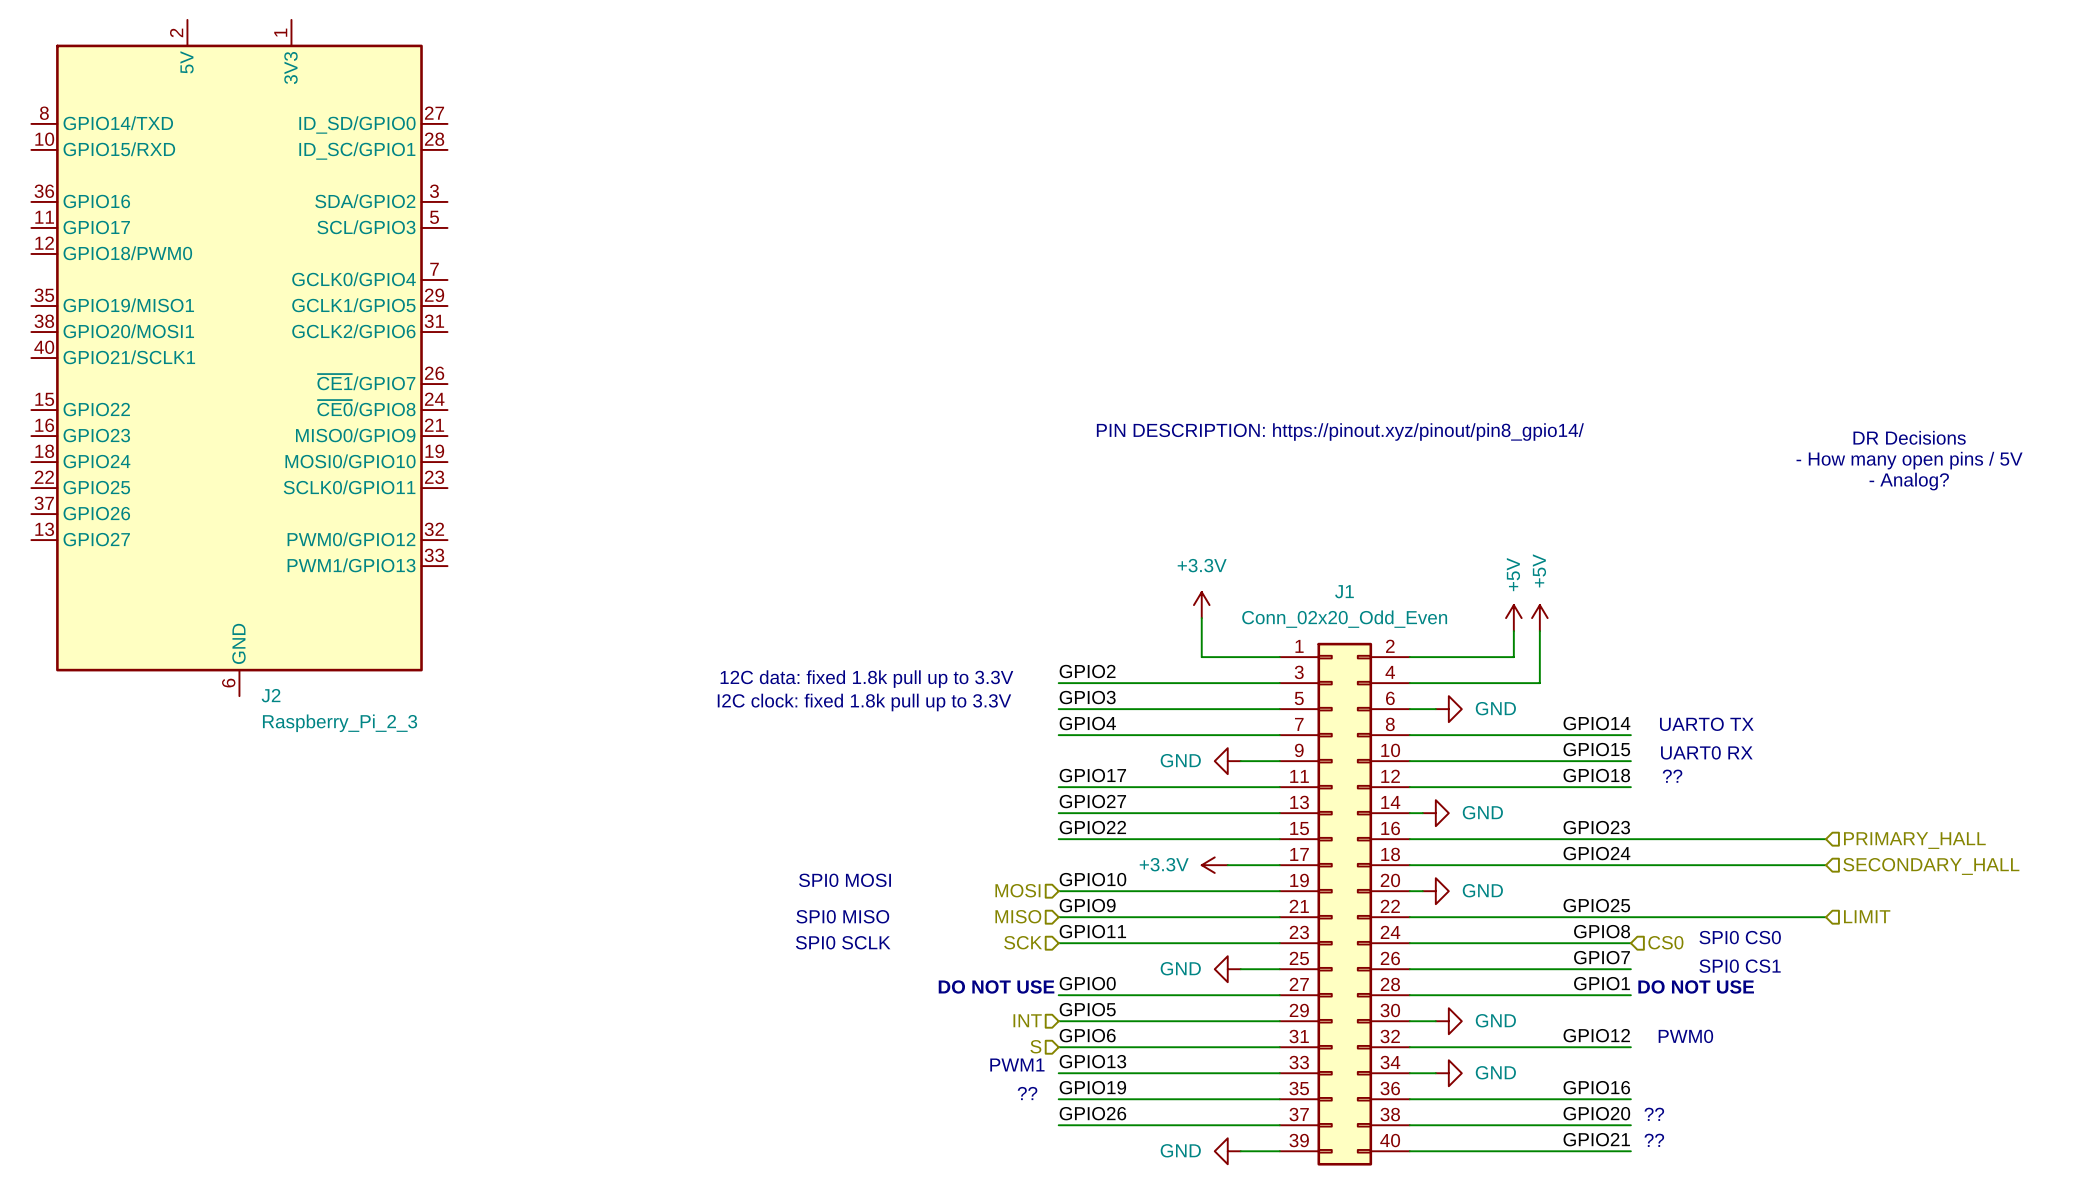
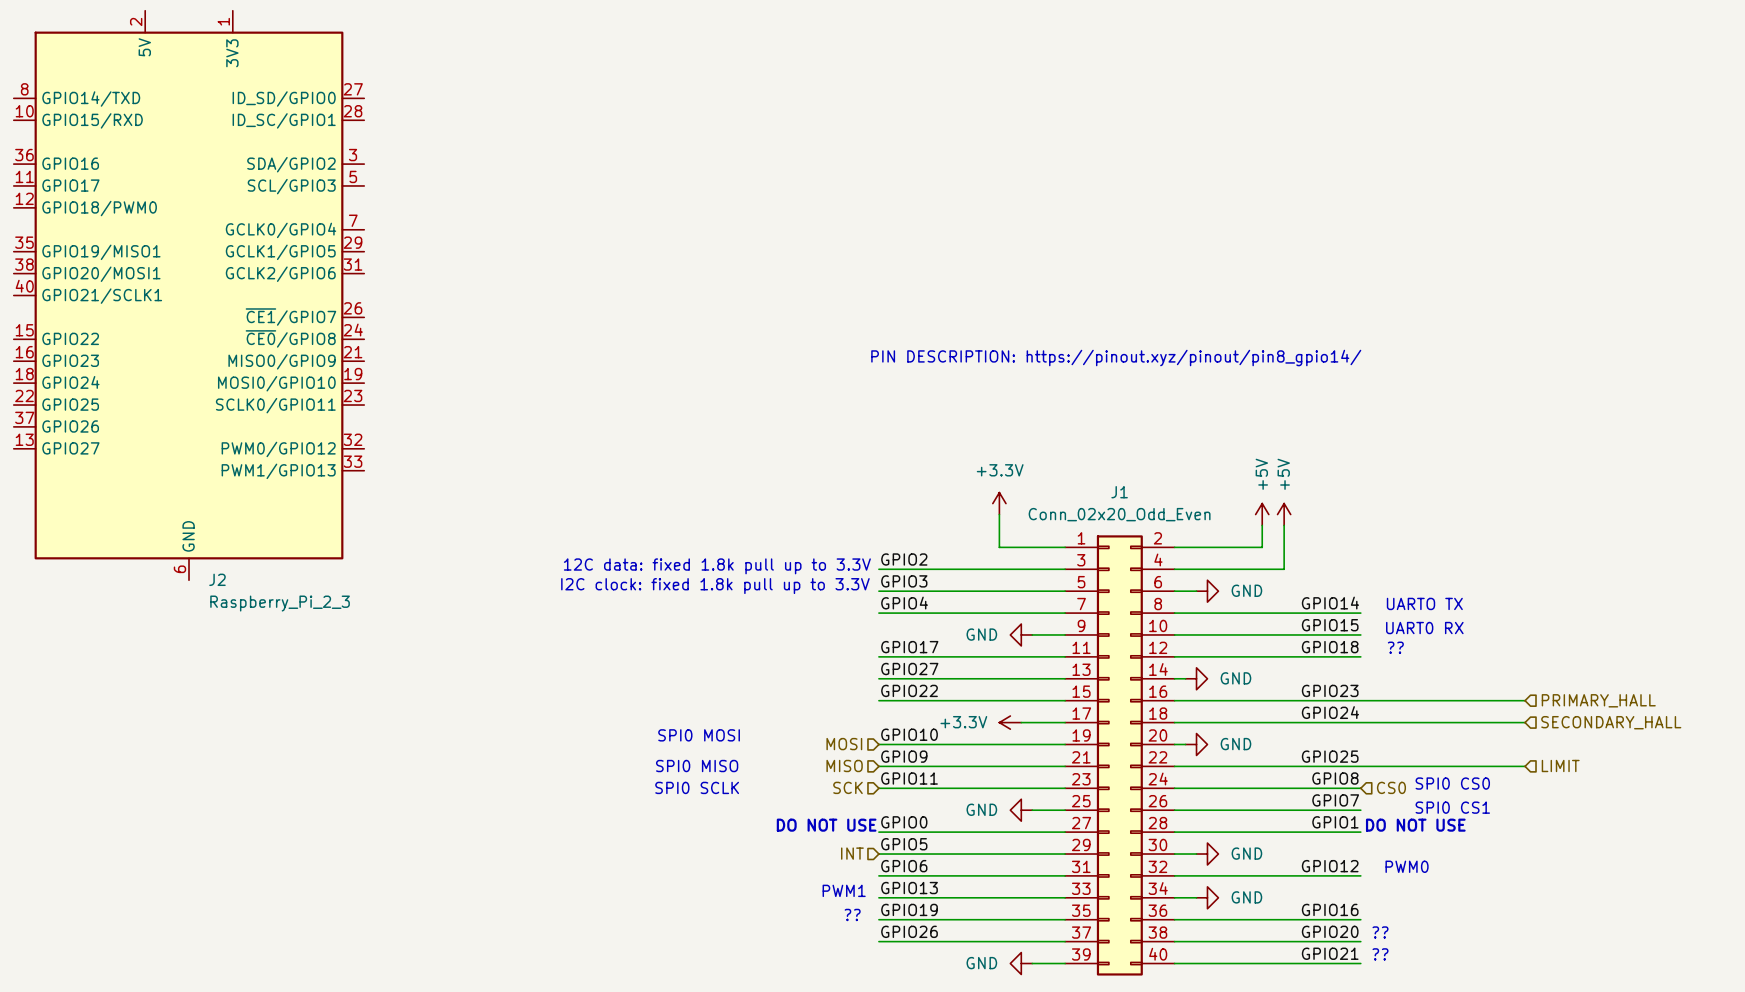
text: DR Decisions (1909, 437) -> none
text: - How many open pins / 5V (1909, 460) -> none
text: - Analog? (1909, 481) -> none
hierarchical label: S (1035, 1046) -> none

